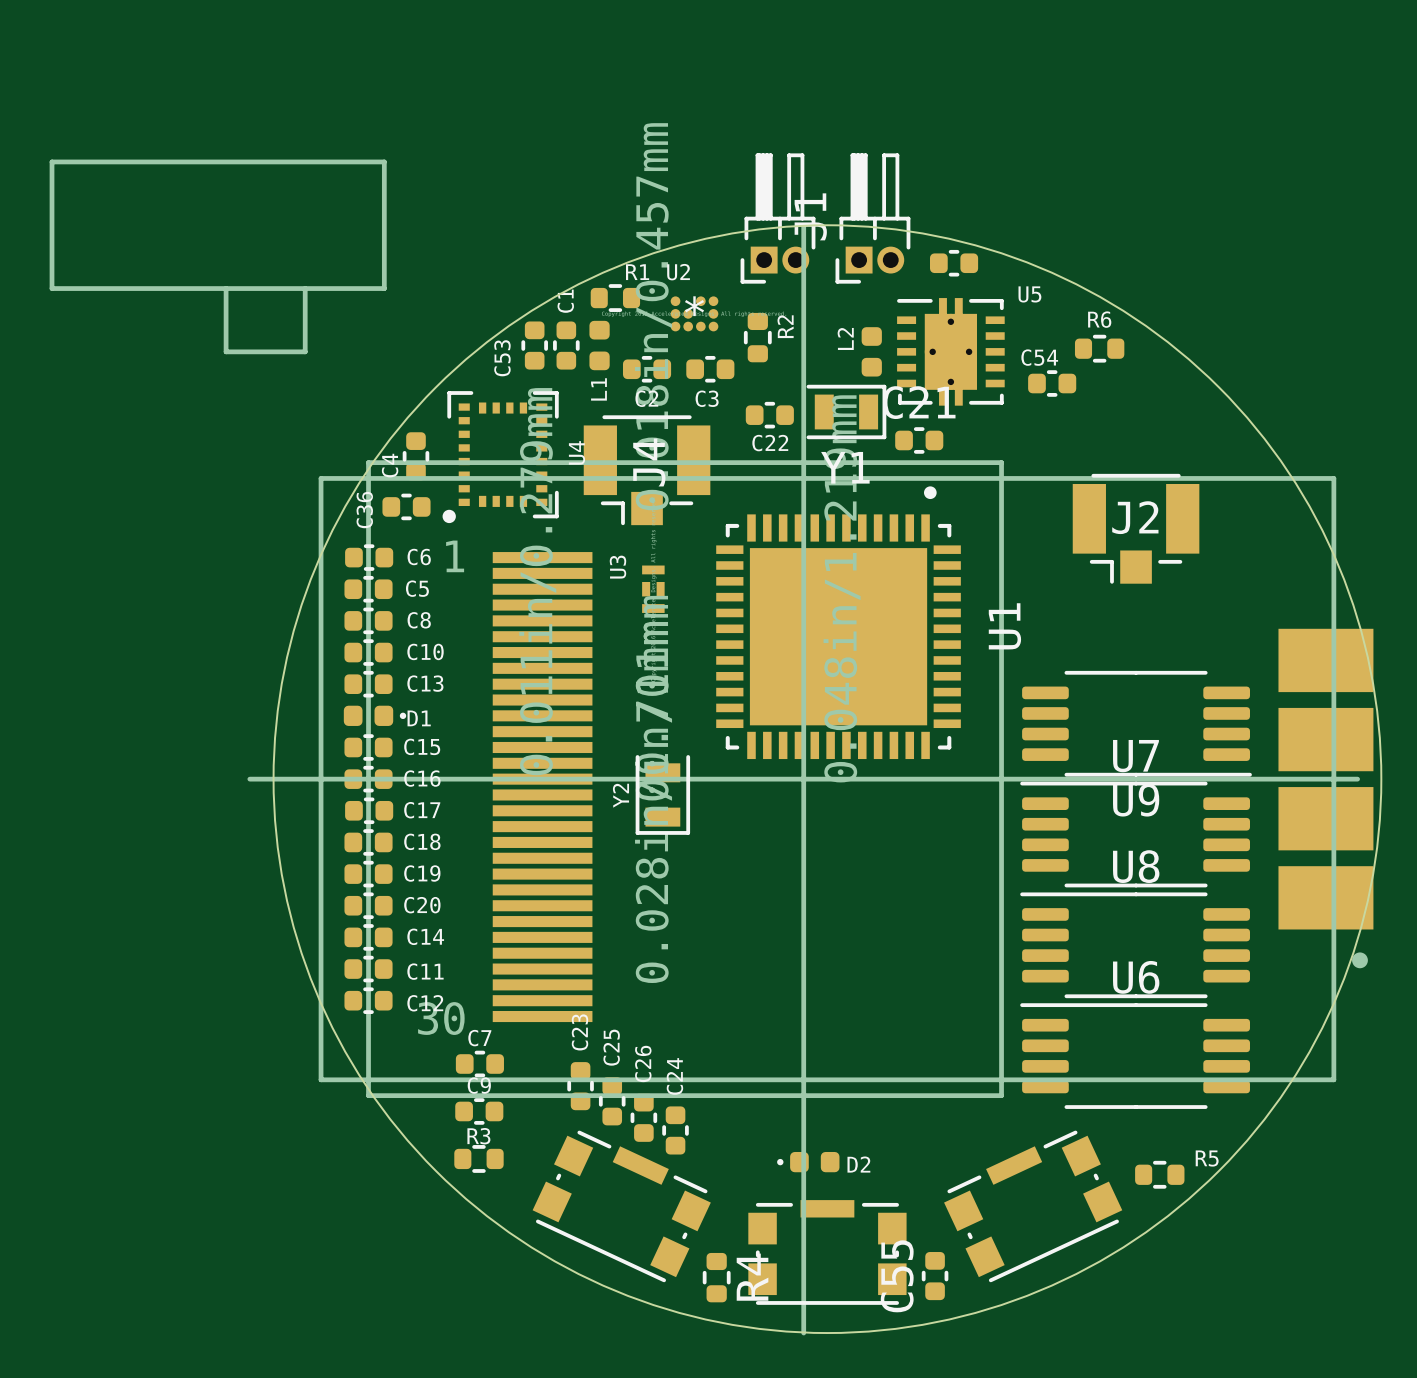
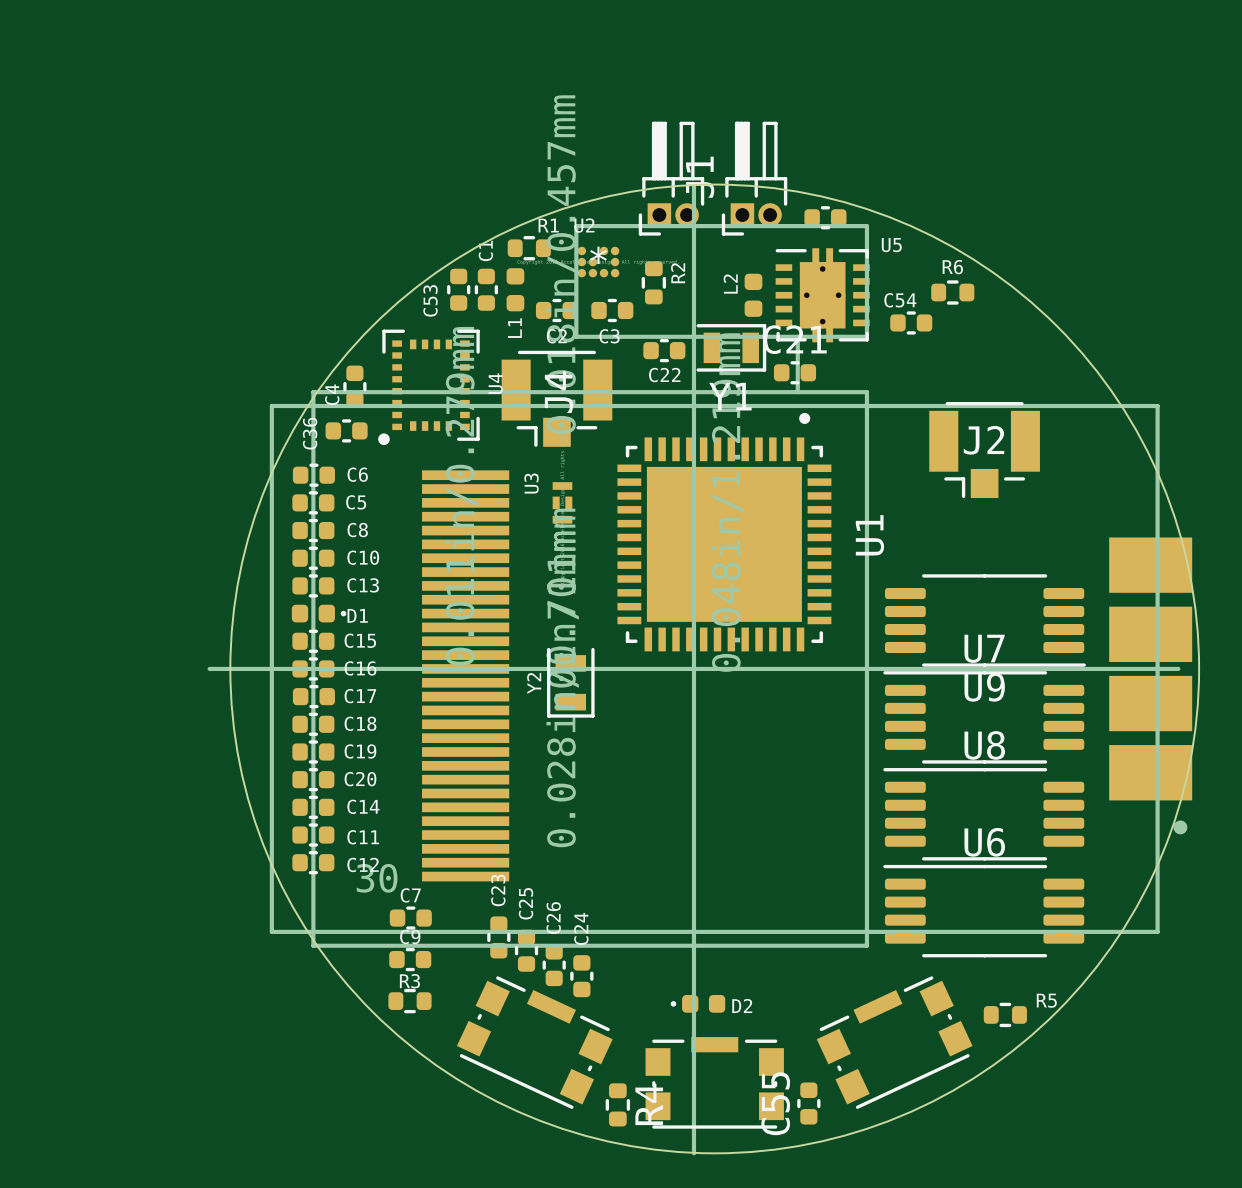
line: (52, 161) (52, 288) (384, 288) (384, 161) (52, 161) -> (576, 226) (576, 336) (866, 336) (866, 226) (576, 226)
line: (226, 288) (226, 351) (305, 351) (305, 288) -> none
line: none -> (797, 336) (797, 392)
part text: 1 (455, 556) -> none

